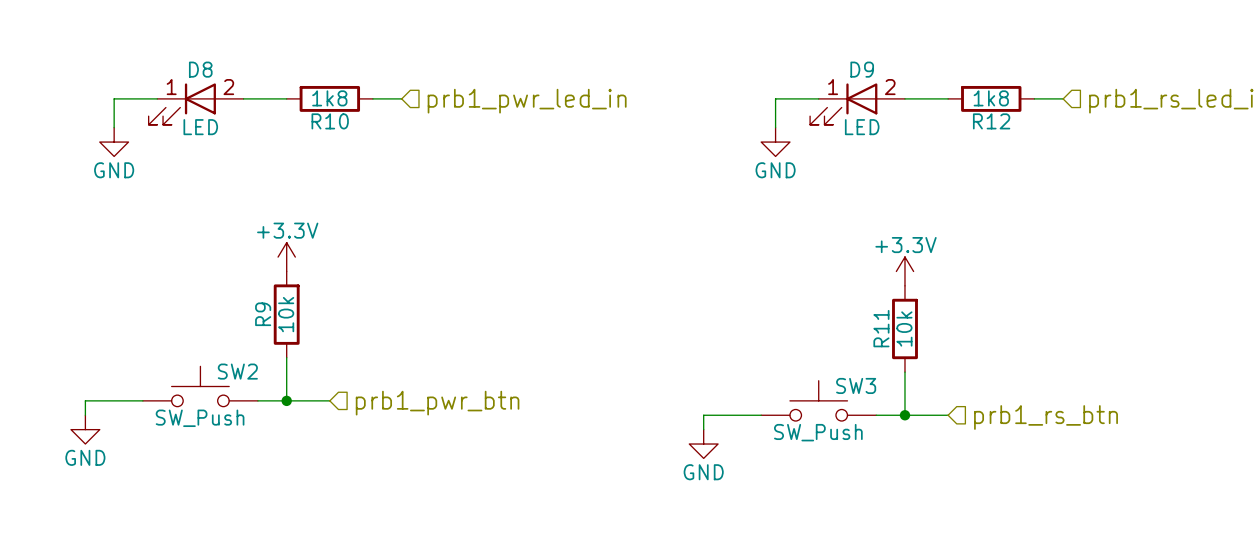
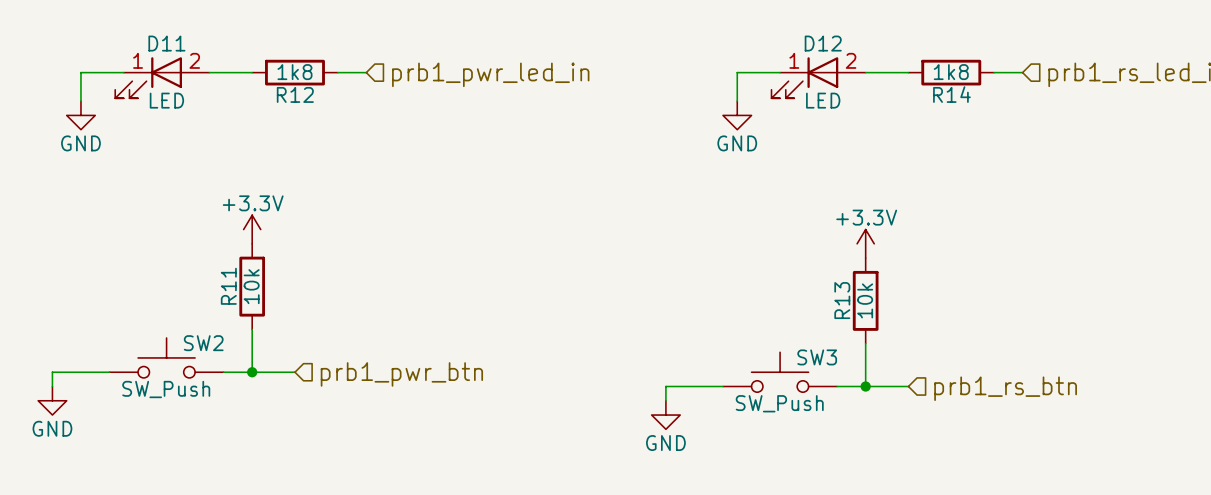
D8 name: D8 (200, 69) -> D11 (166, 43)
D9 name: D9 (862, 69) -> D12 (823, 43)
R10 name: R10 (330, 121) -> R12 (295, 94)
R12 name: R12 (991, 121) -> R14 (951, 94)
R9 name: R9 (263, 314) -> R11 (228, 286)
R11 name: R11 (881, 328) -> R13 (842, 300)

